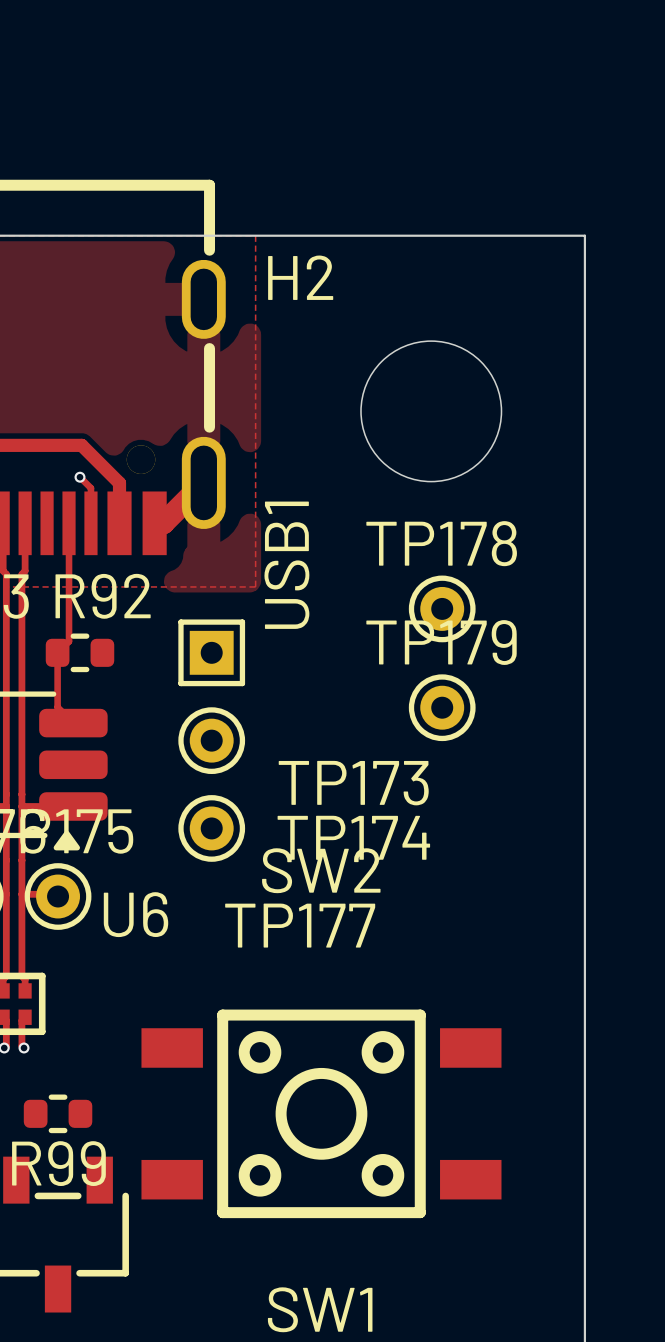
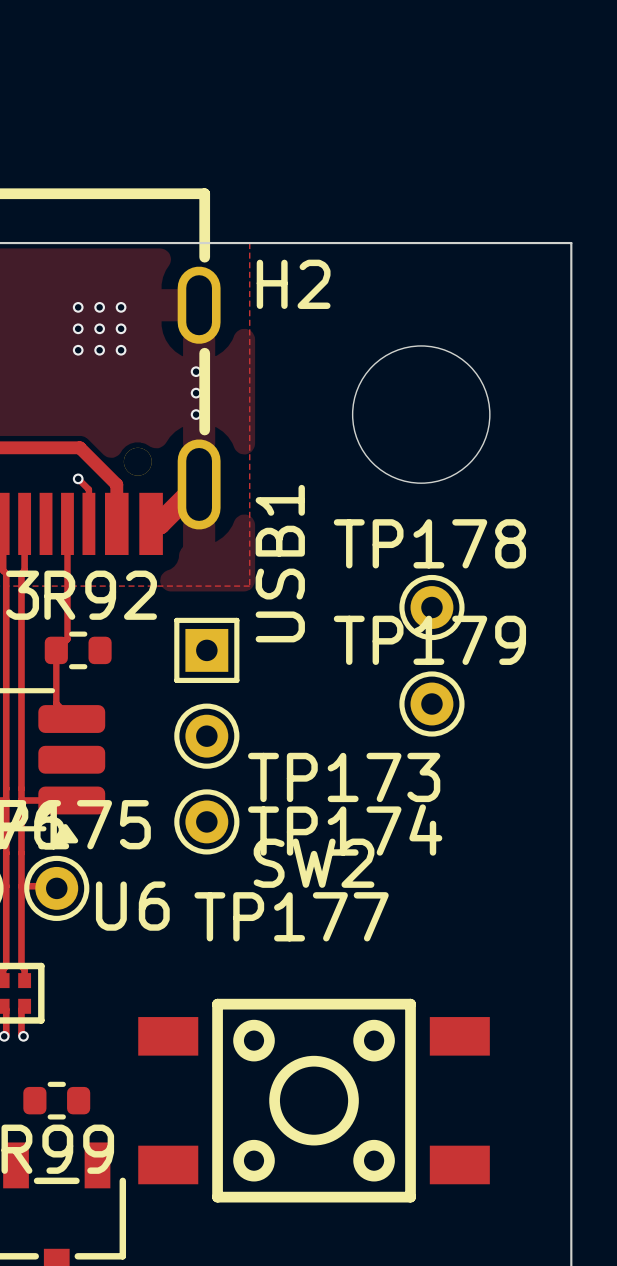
via: none -> (78, 307)
via: none -> (99, 307)
via: none -> (121, 307)
via: none -> (78, 328)
via: none -> (99, 328)
via: none -> (121, 328)
via: none -> (78, 350)
via: none -> (99, 350)
via: none -> (121, 350)
via: none -> (196, 371)
via: none -> (196, 393)
via: none -> (196, 414)

